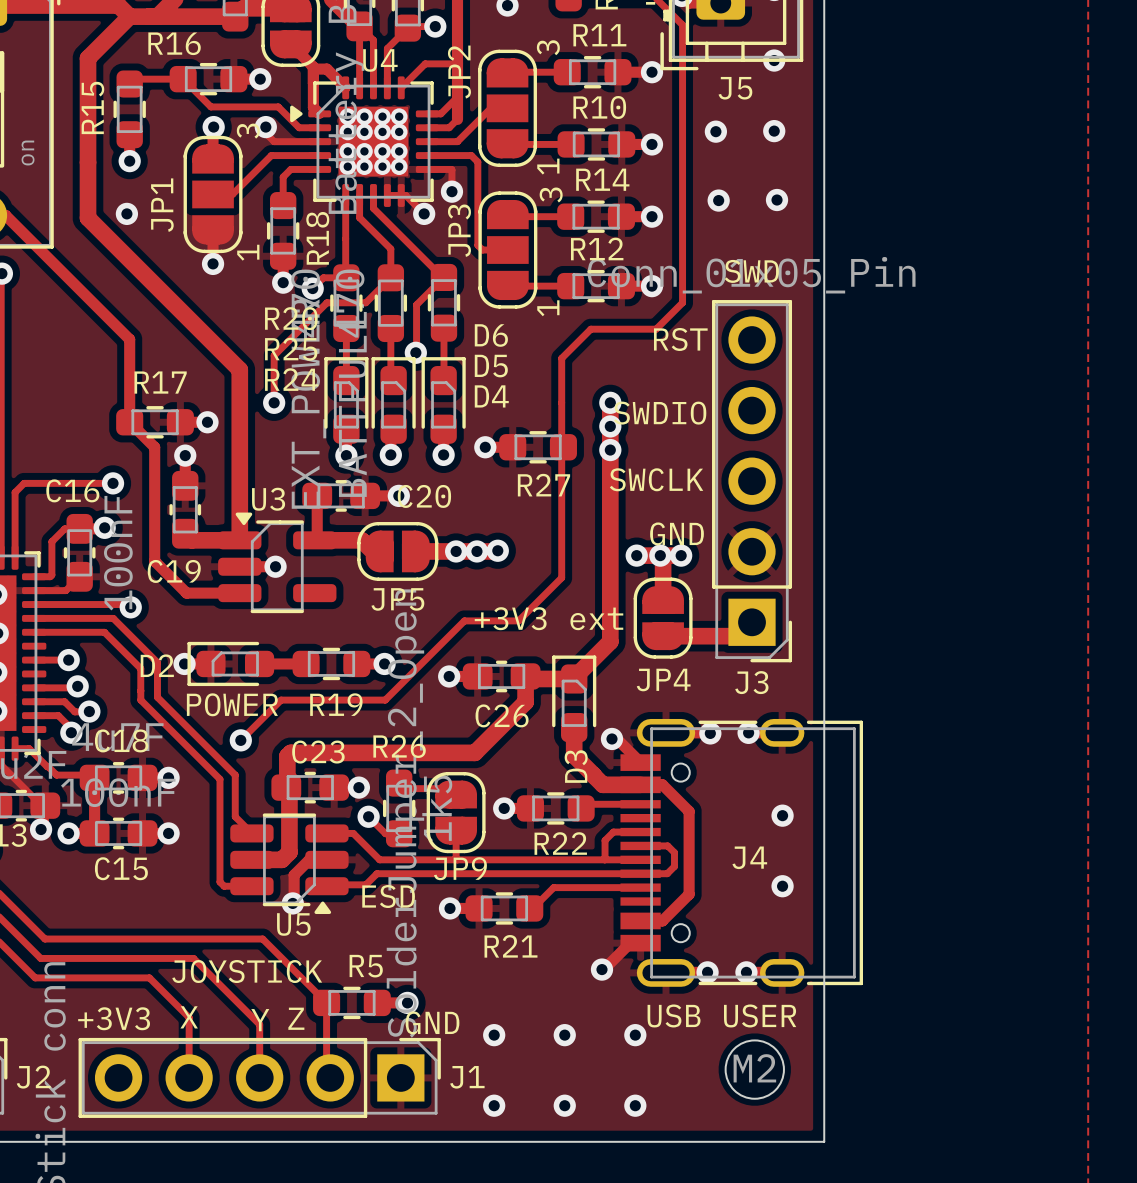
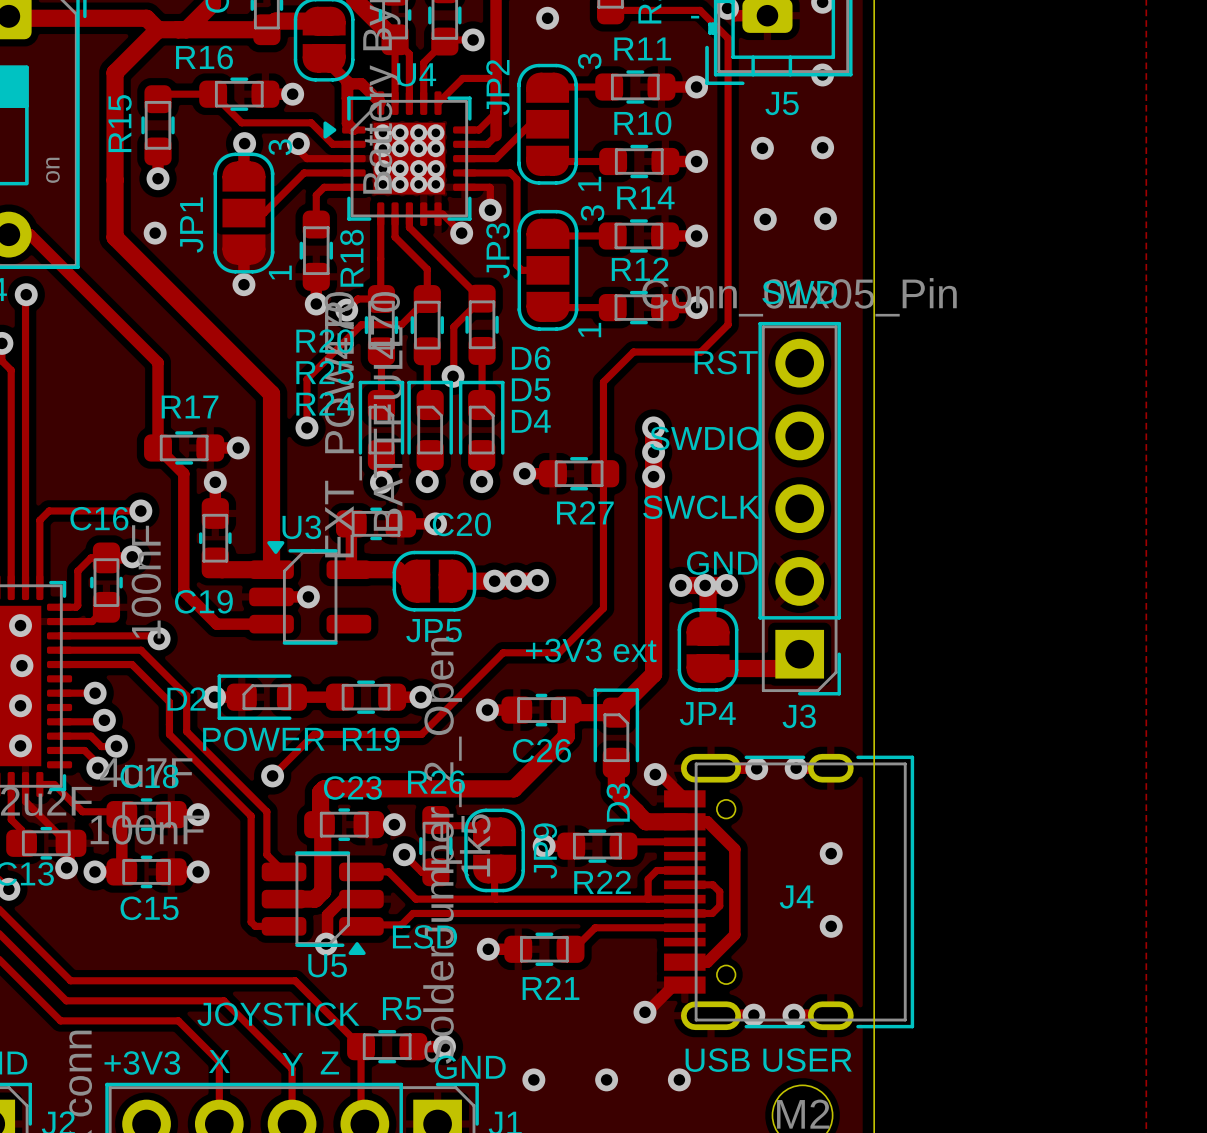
JP9 name rotation: 0° (460, 868) -> 90° counterclockwise (545, 850)
JP9 name position: JP9 (460, 868) -> JP9 (545, 850)

